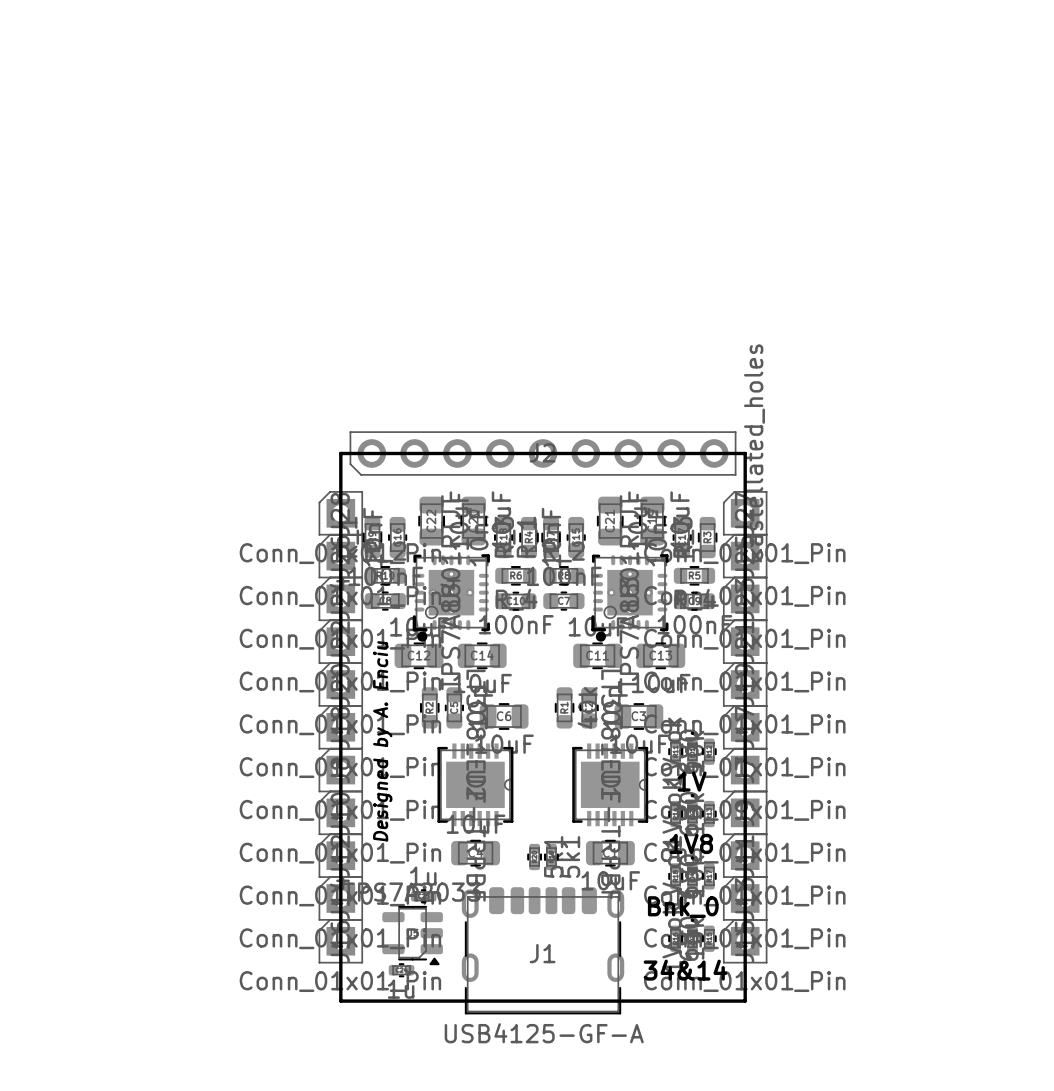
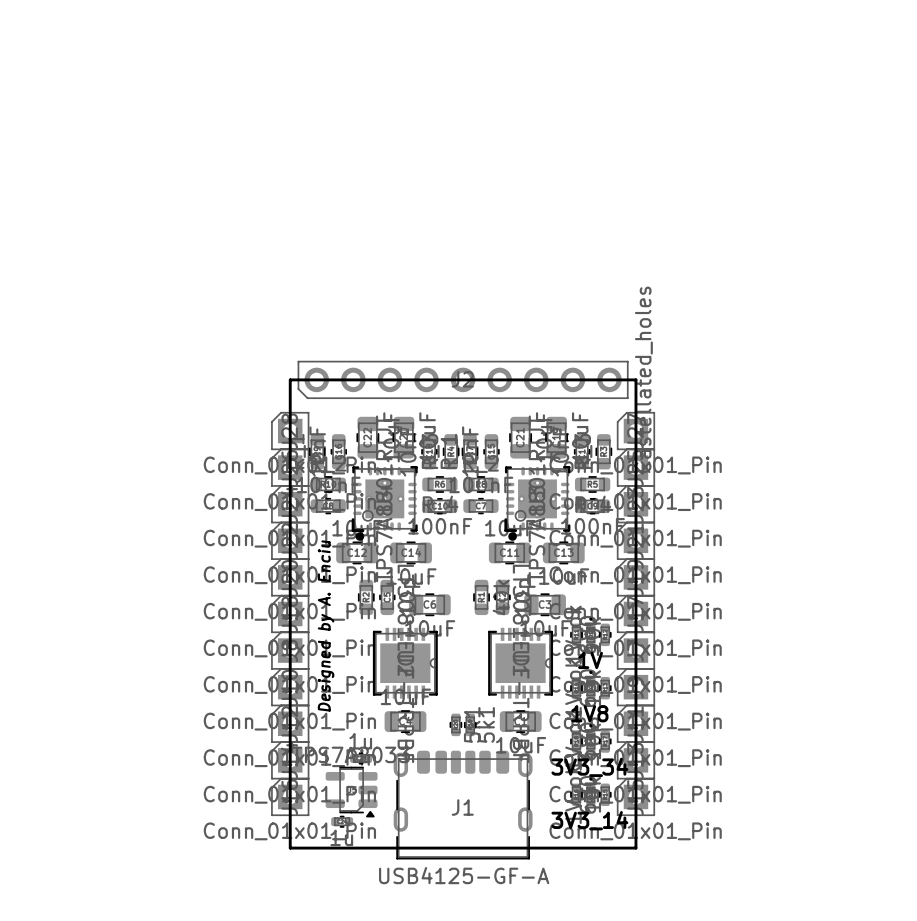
text: Bnk_0 (683, 907) -> 3V3_34 (589, 767)
text: 34&14 (685, 970) -> 3V3_14 (589, 820)

